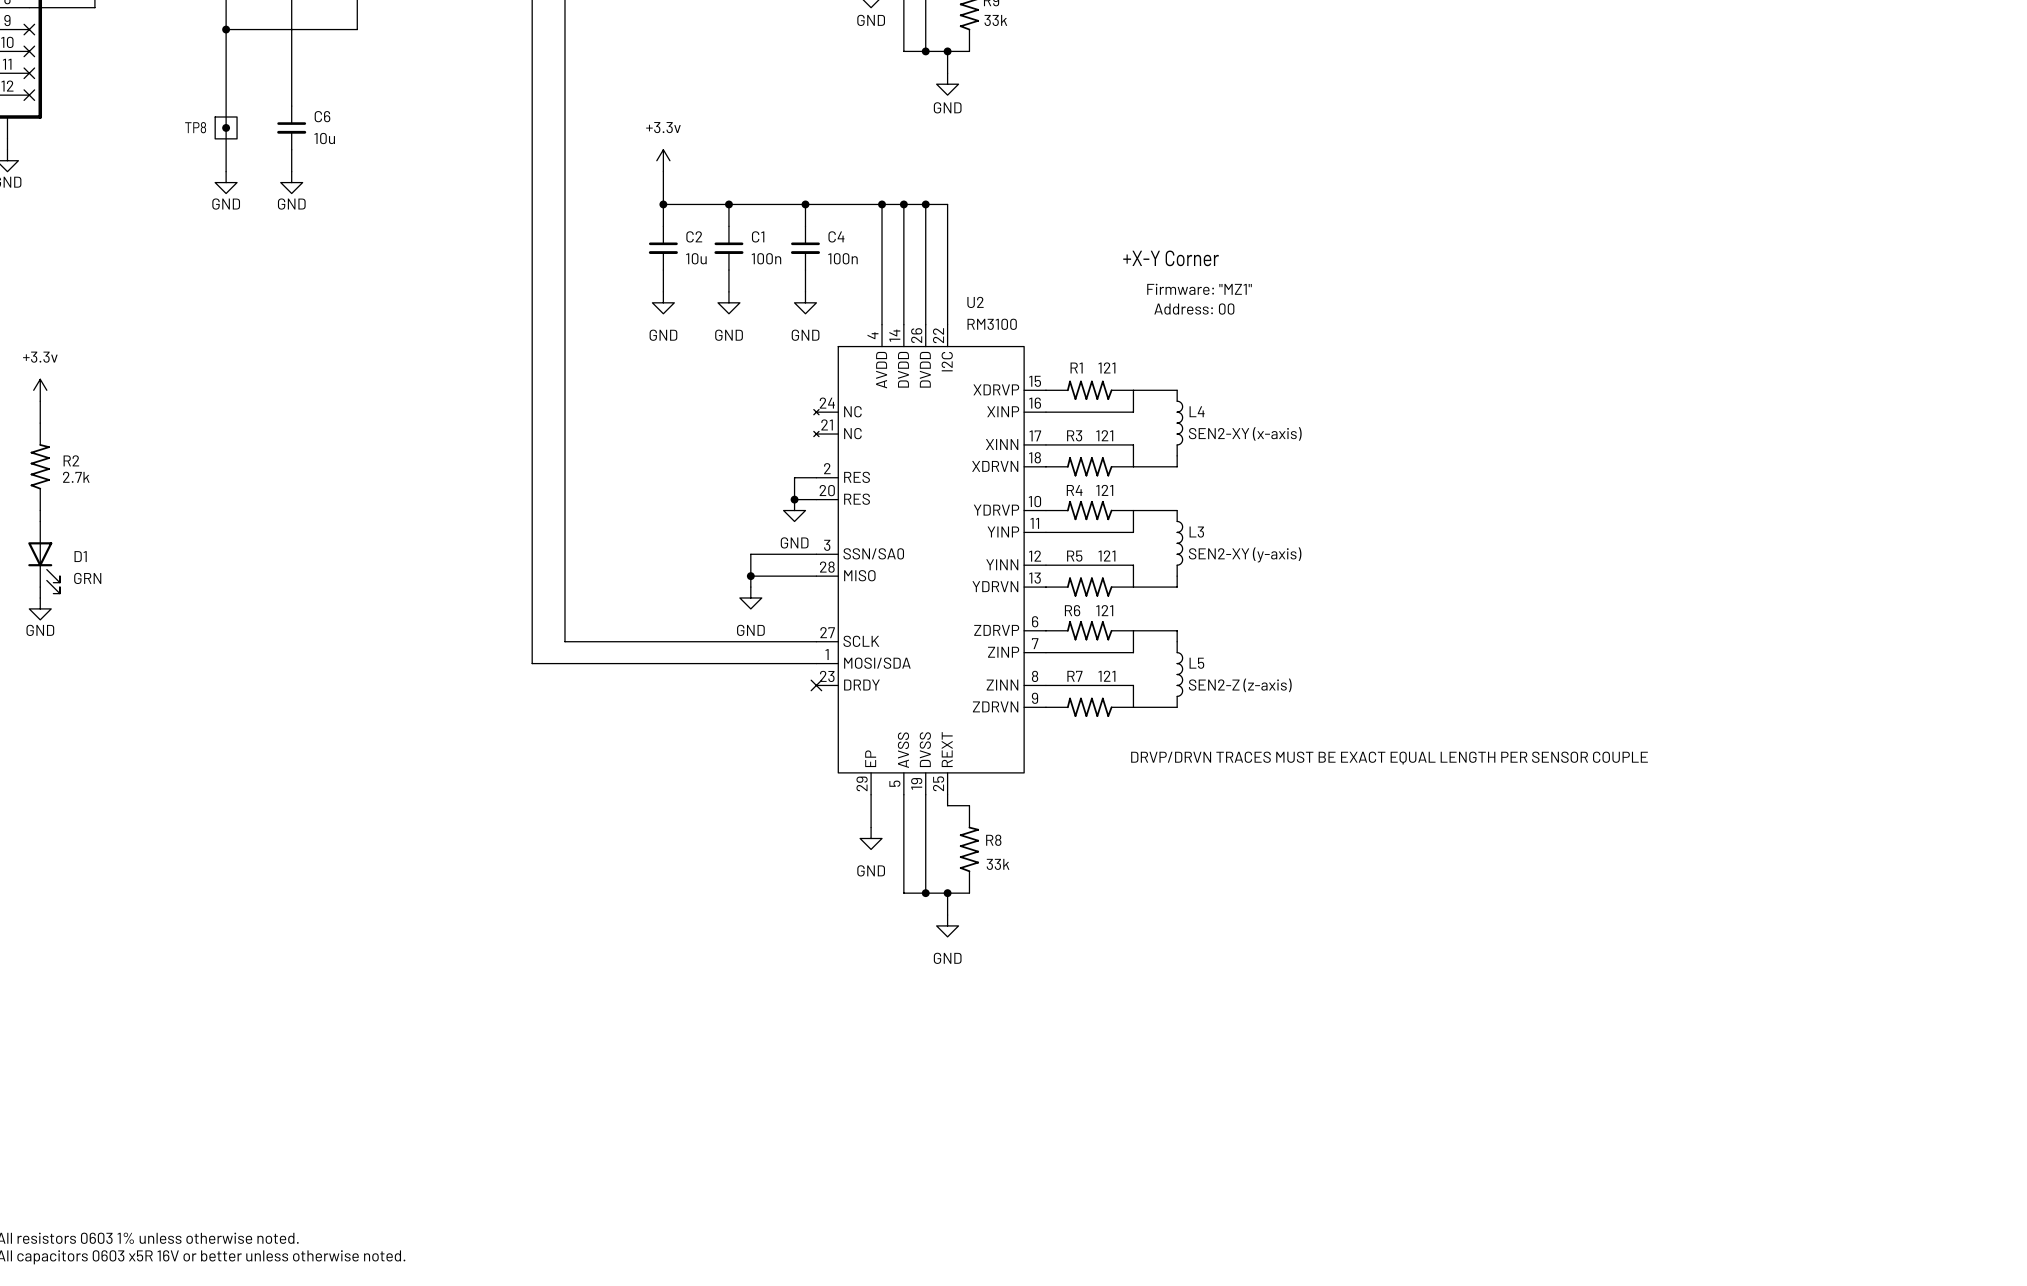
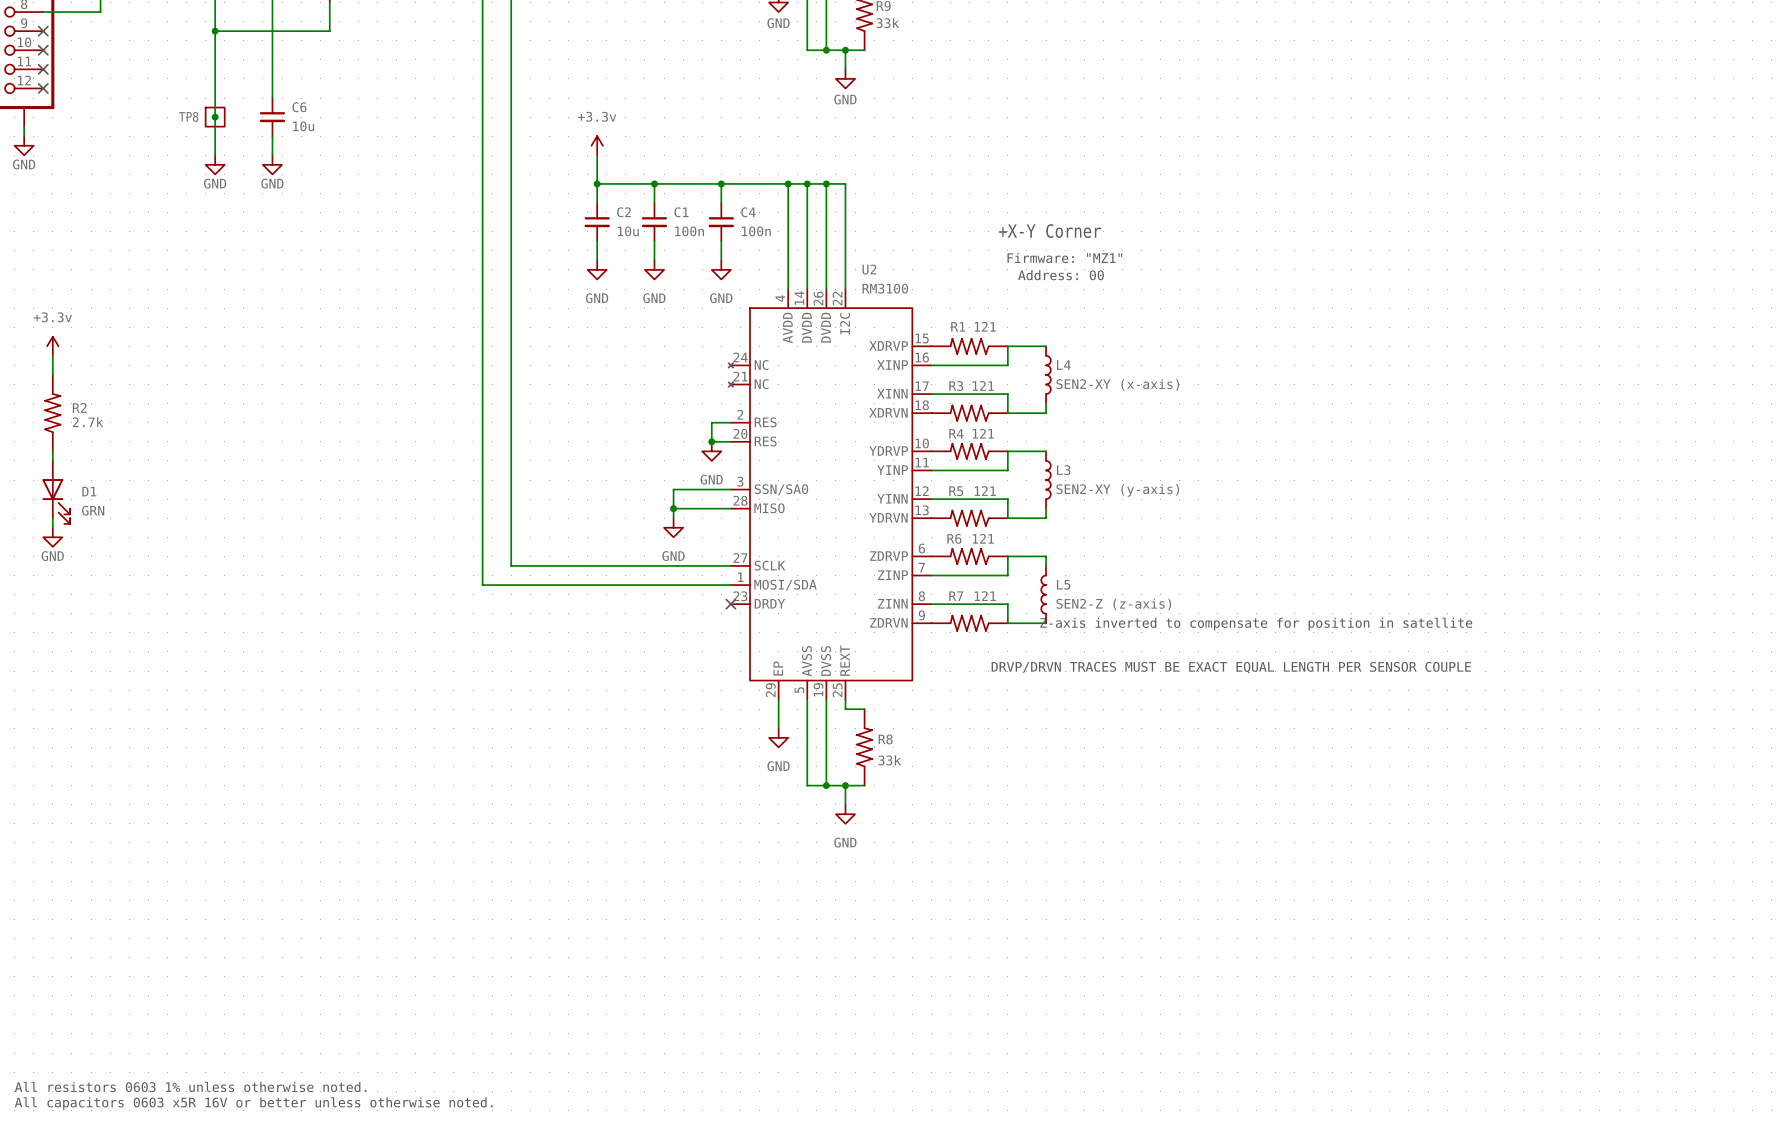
L5 rotation: 0° (1179, 674) -> 180° (1043, 594)
text: none -> Z-axis inverted to compensate for position in satellite (1256, 624)

